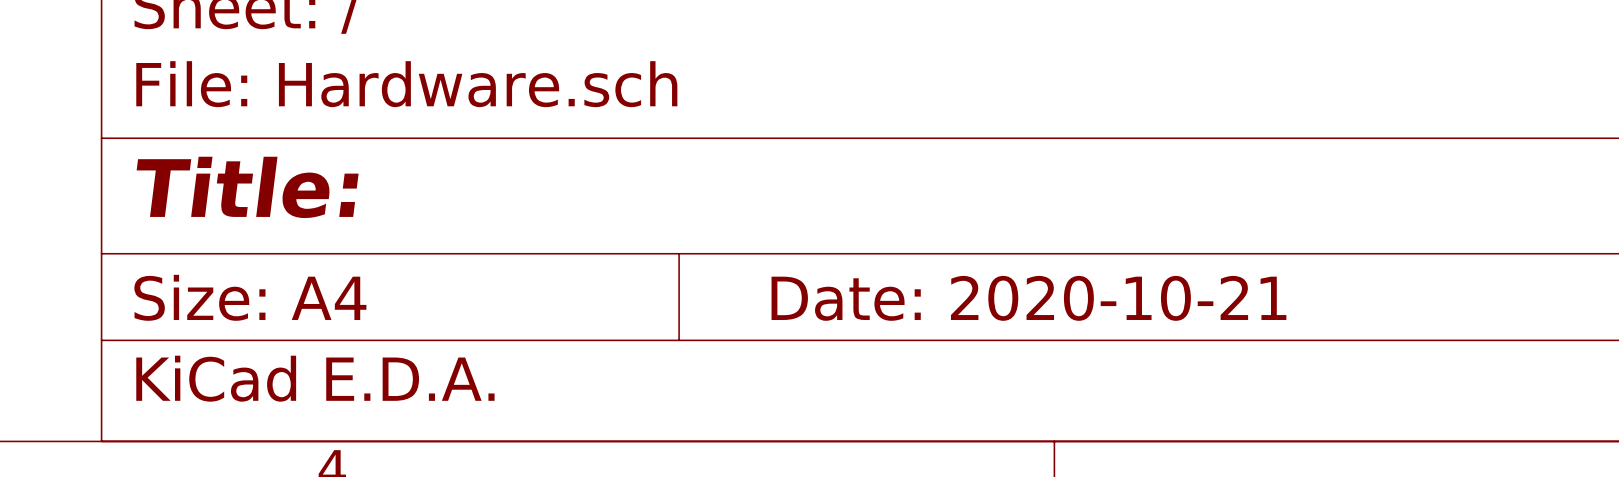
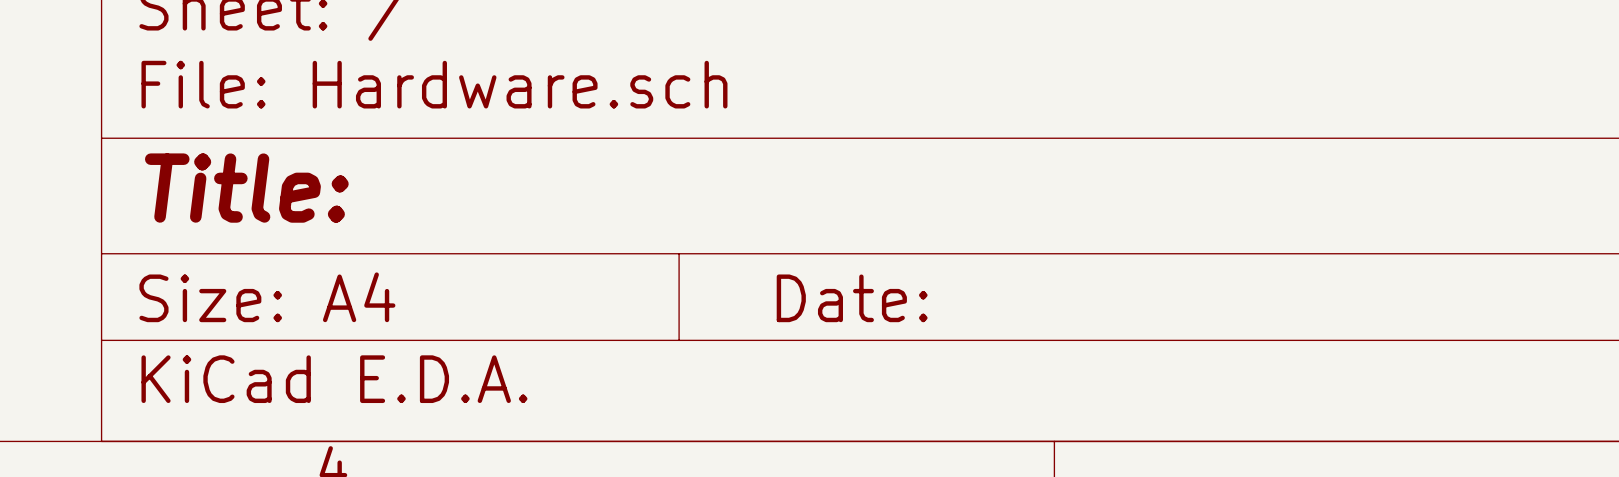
title block: Date: 2020-10-21 (1028, 298) -> Date: (852, 298)

